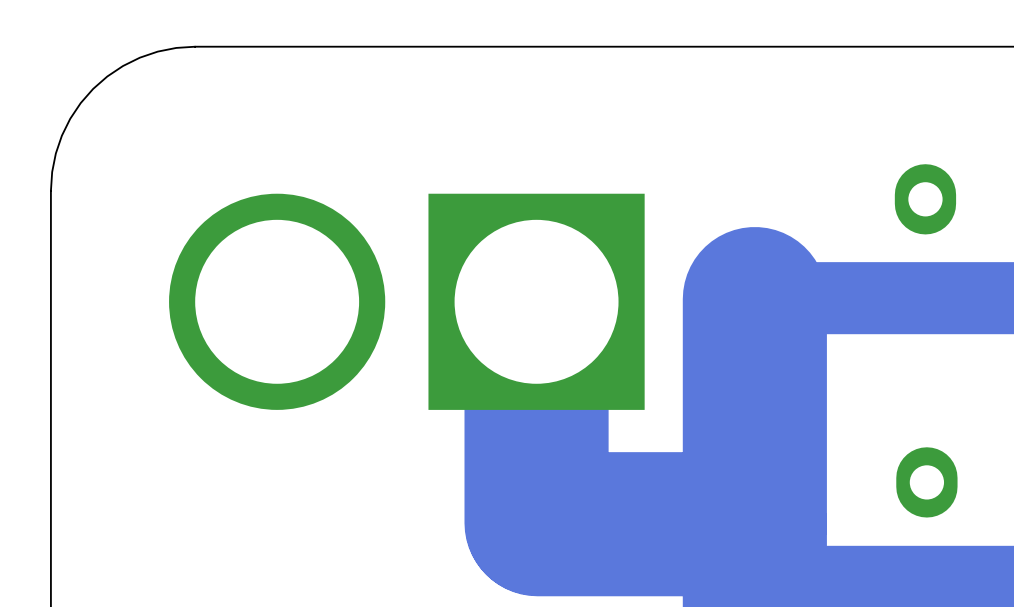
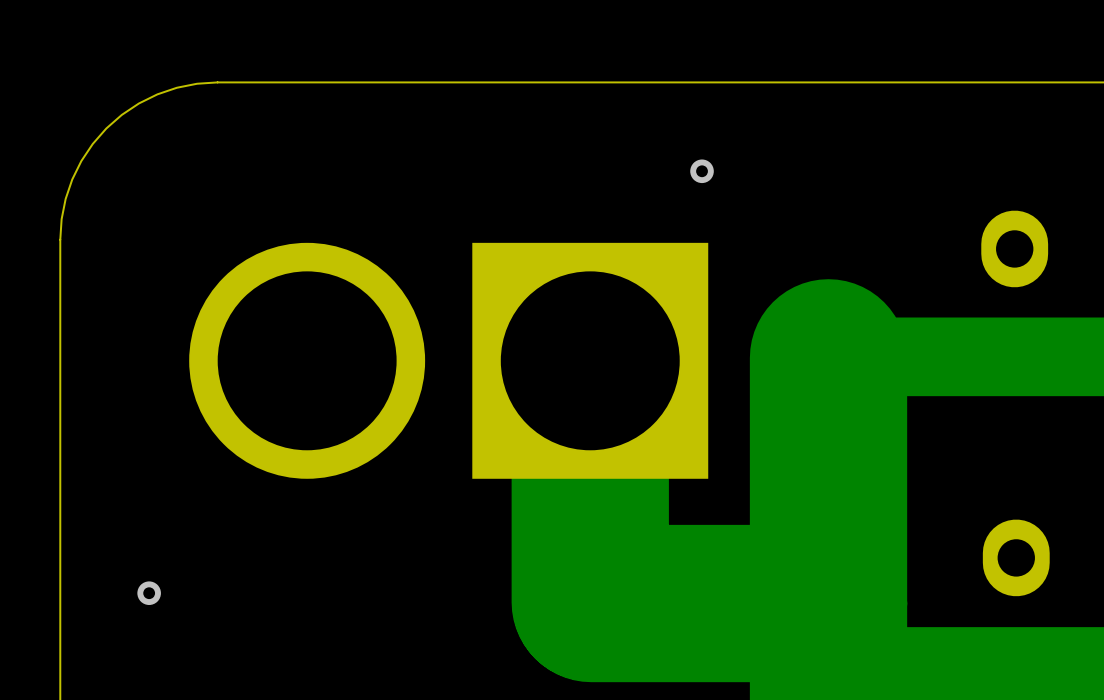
via: none -> (702, 171)
via: none -> (149, 593)

